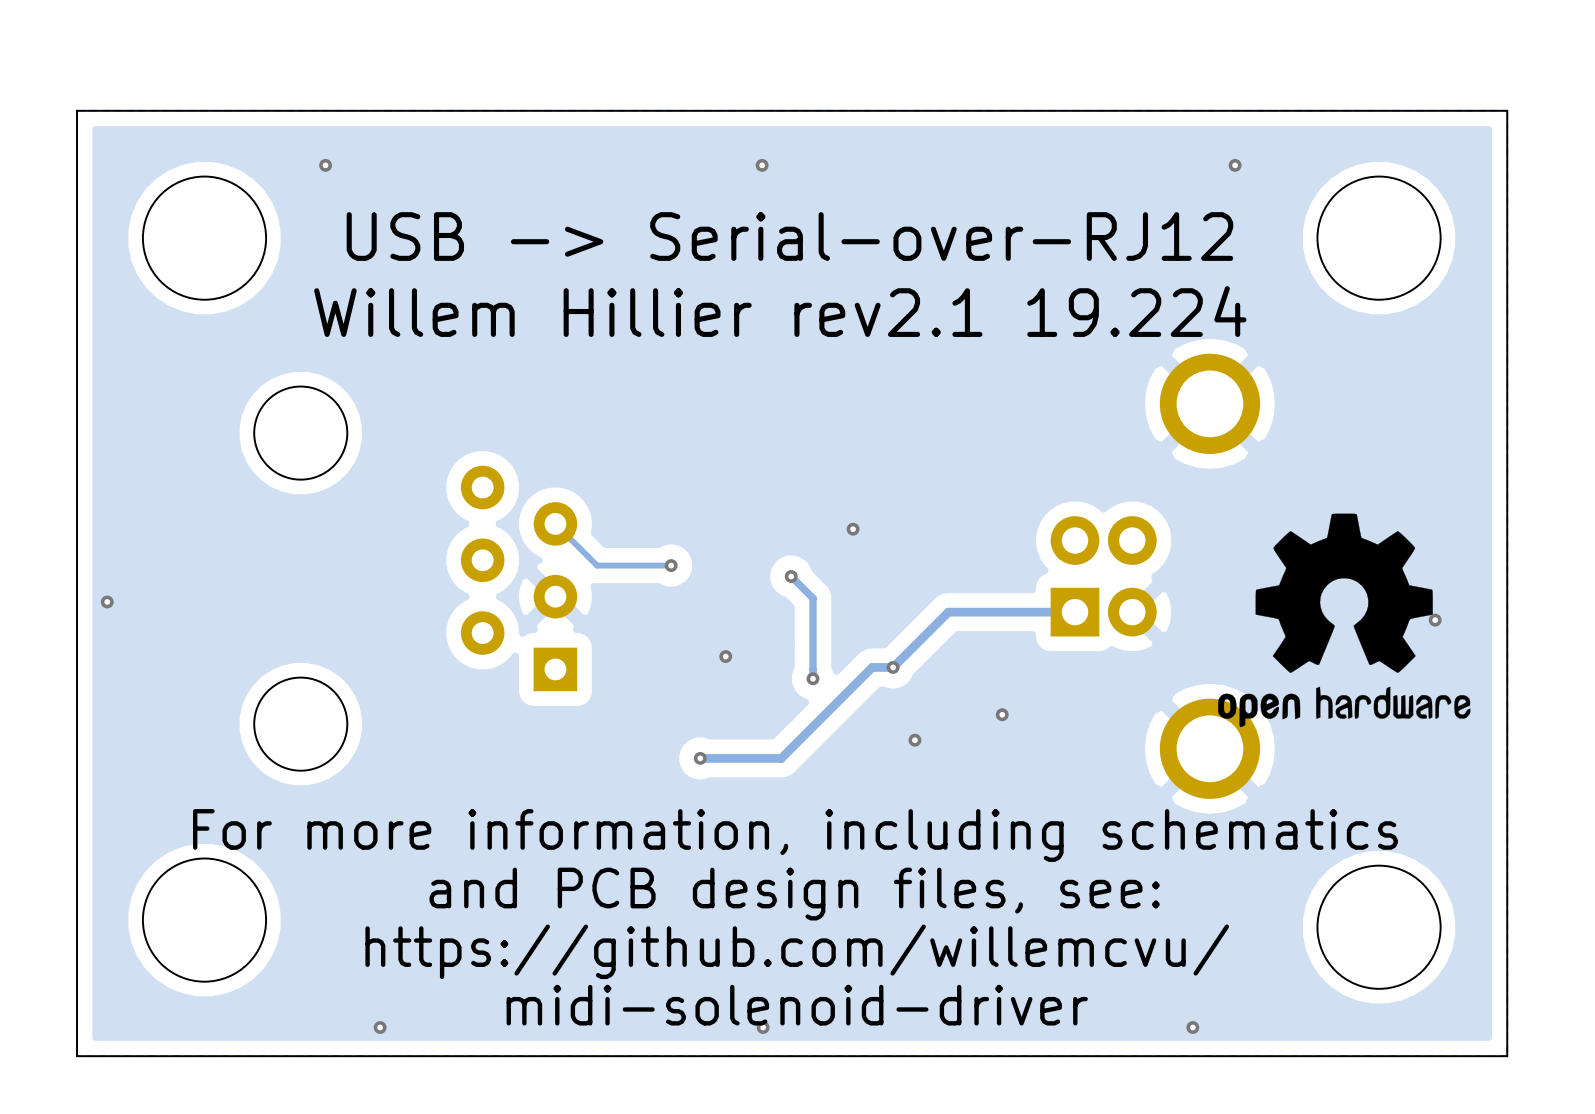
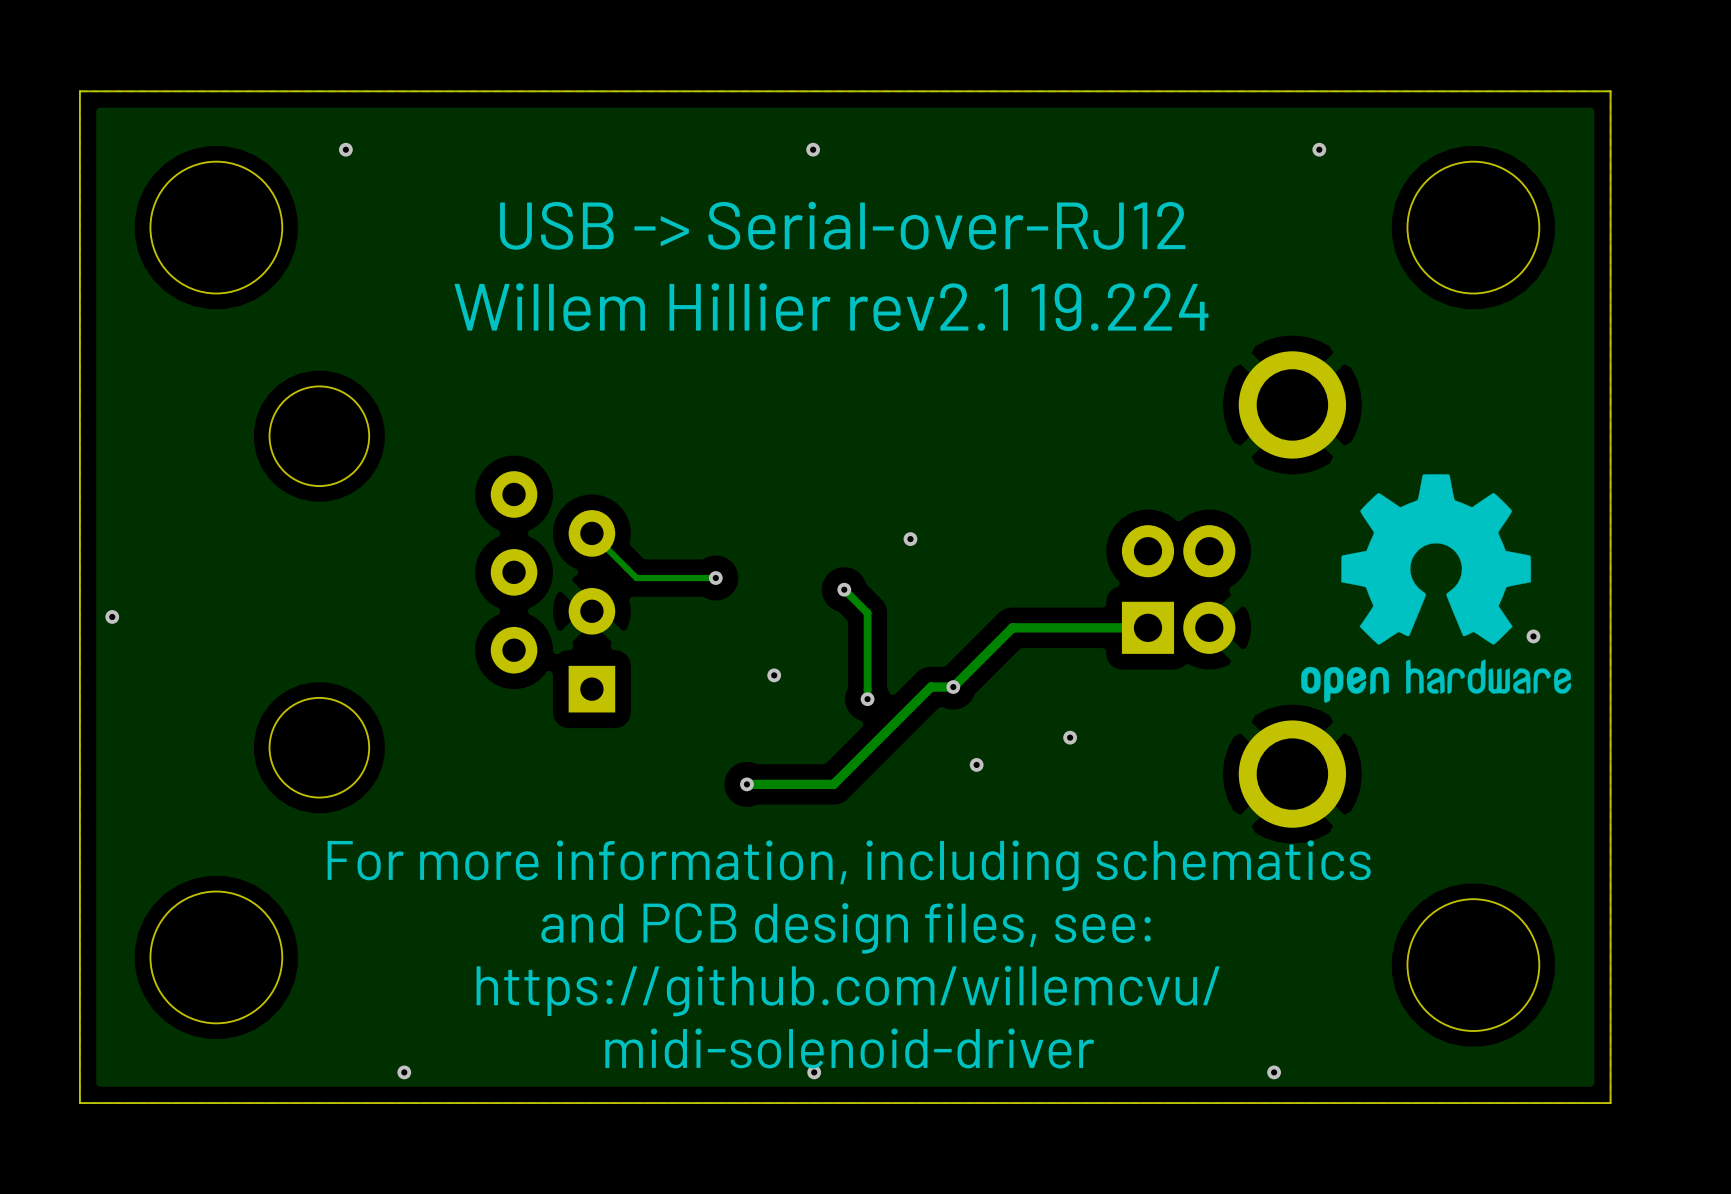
drawing position: (1344, 620) -> (1436, 588)

